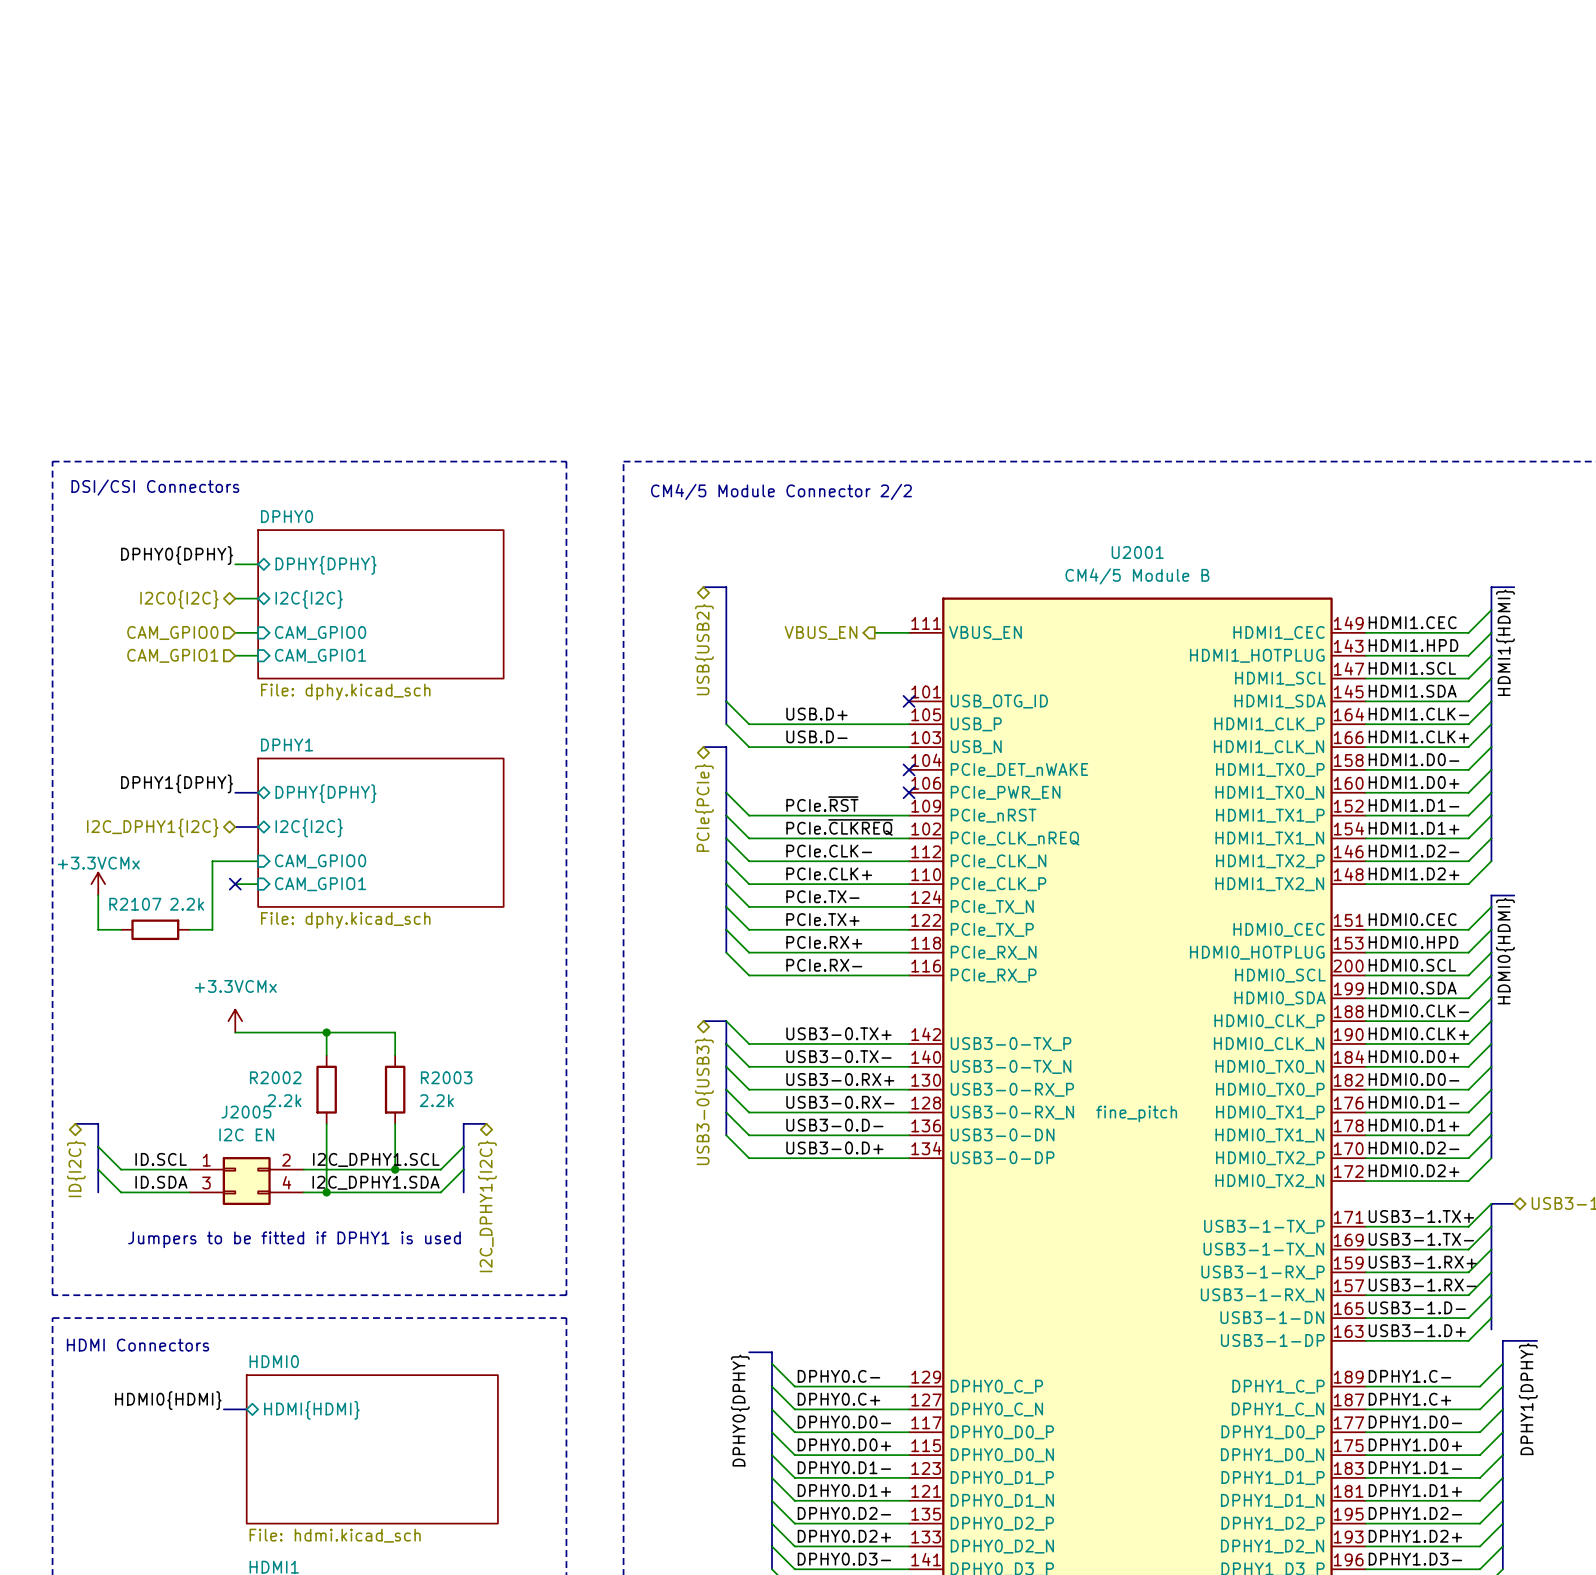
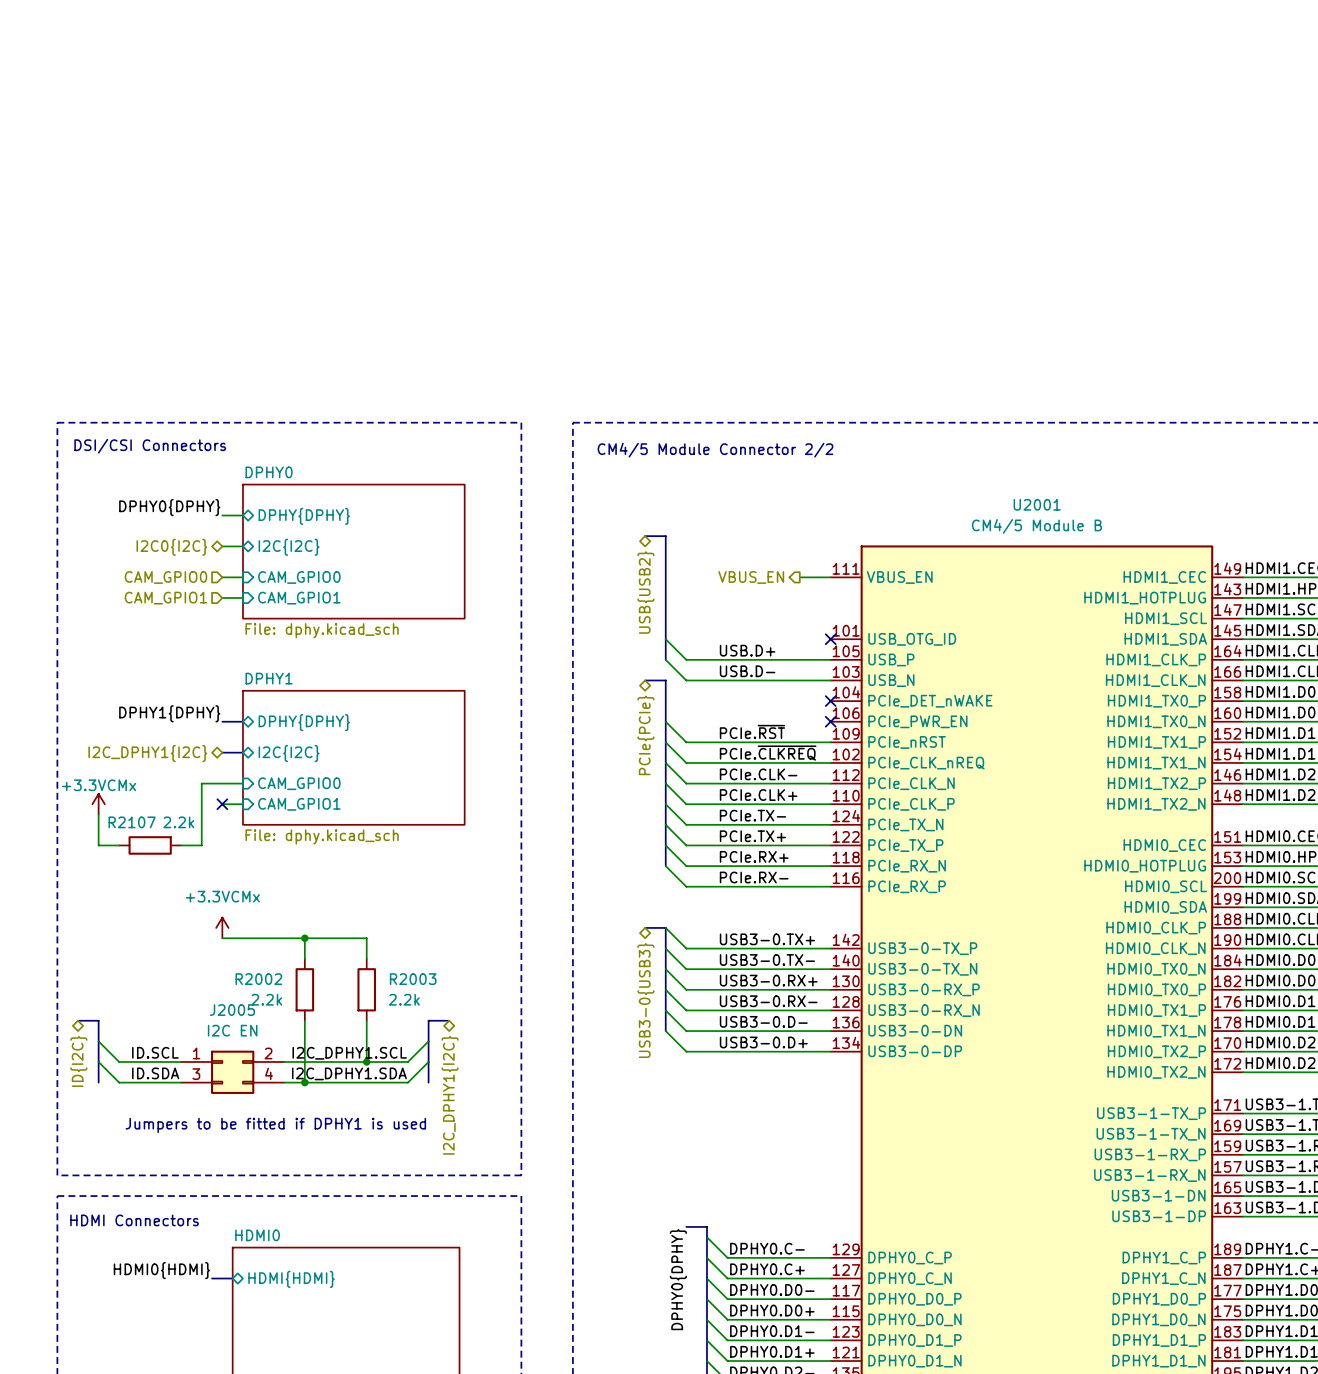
U2001 text: fine_pitch (1136, 1113) -> none

